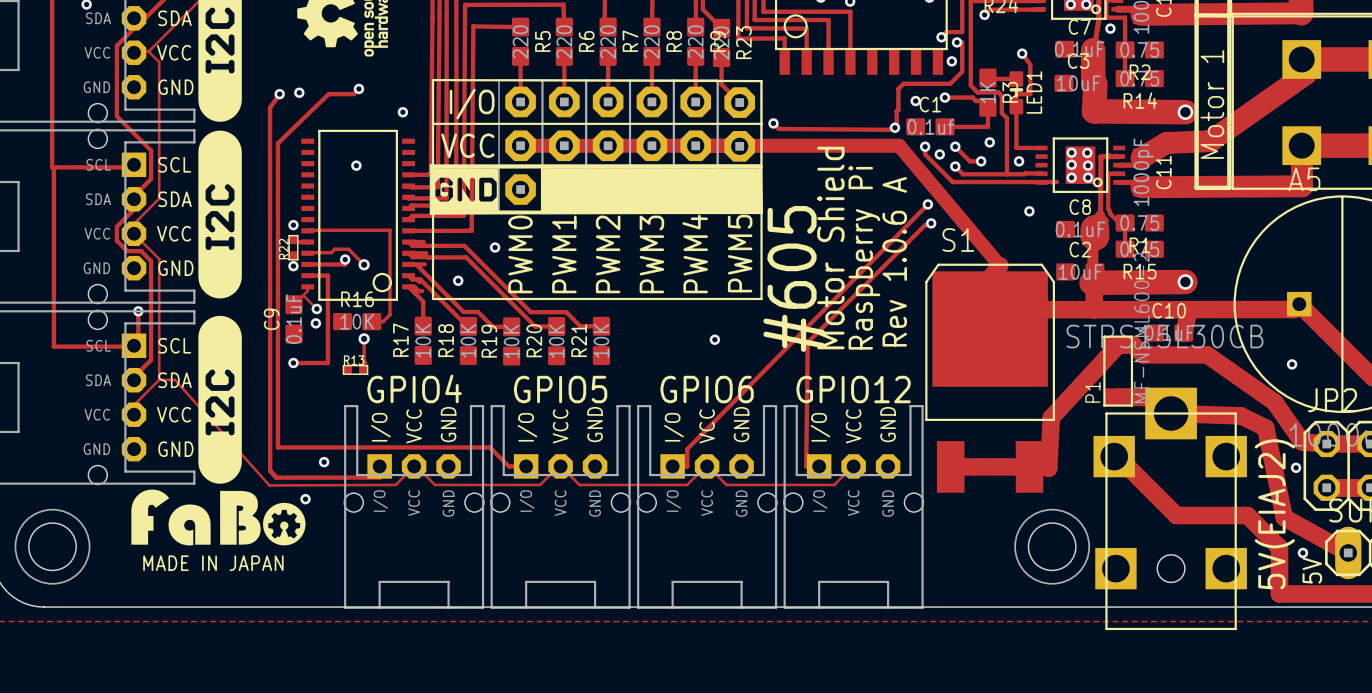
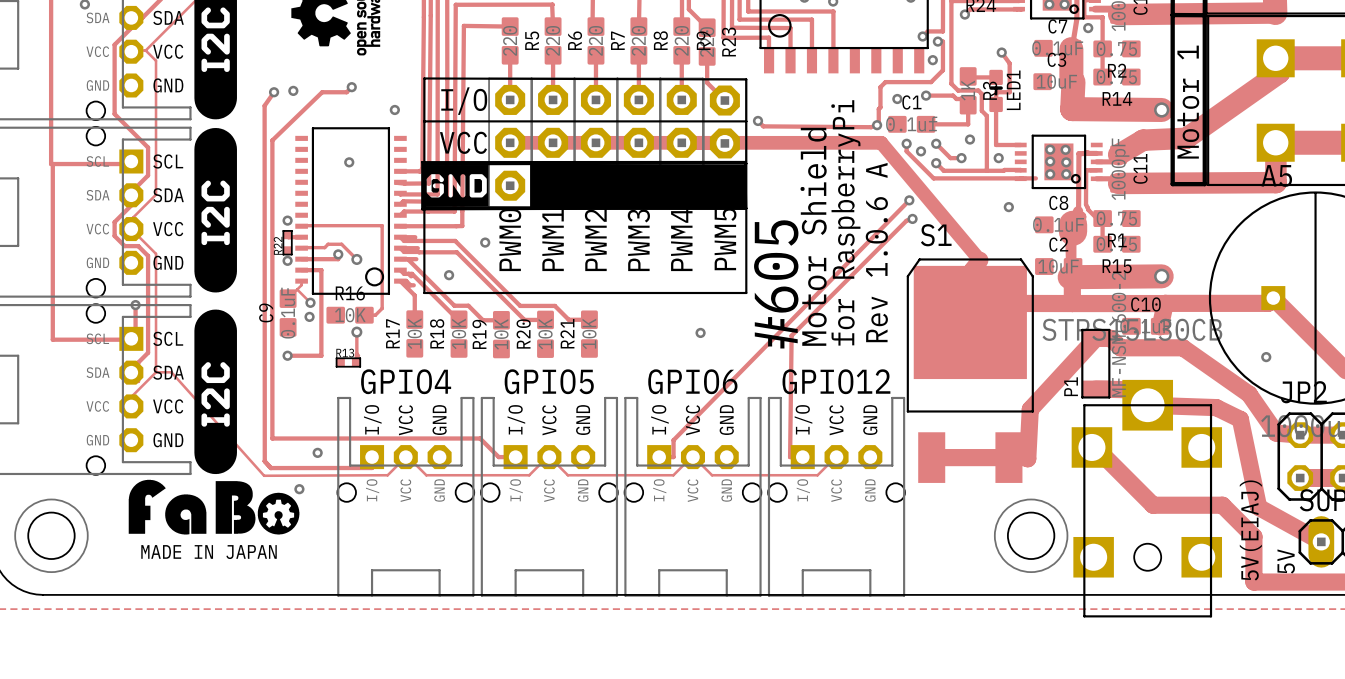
text: Raspberry Pi (864, 257) -> for RaspberryPi (845, 222)
via: (1296, 467) -> none
text: 5V(EIAJ2) (1274, 514) -> 5V(EIAJ) (1250, 530)
via: (1302, 552) -> none

